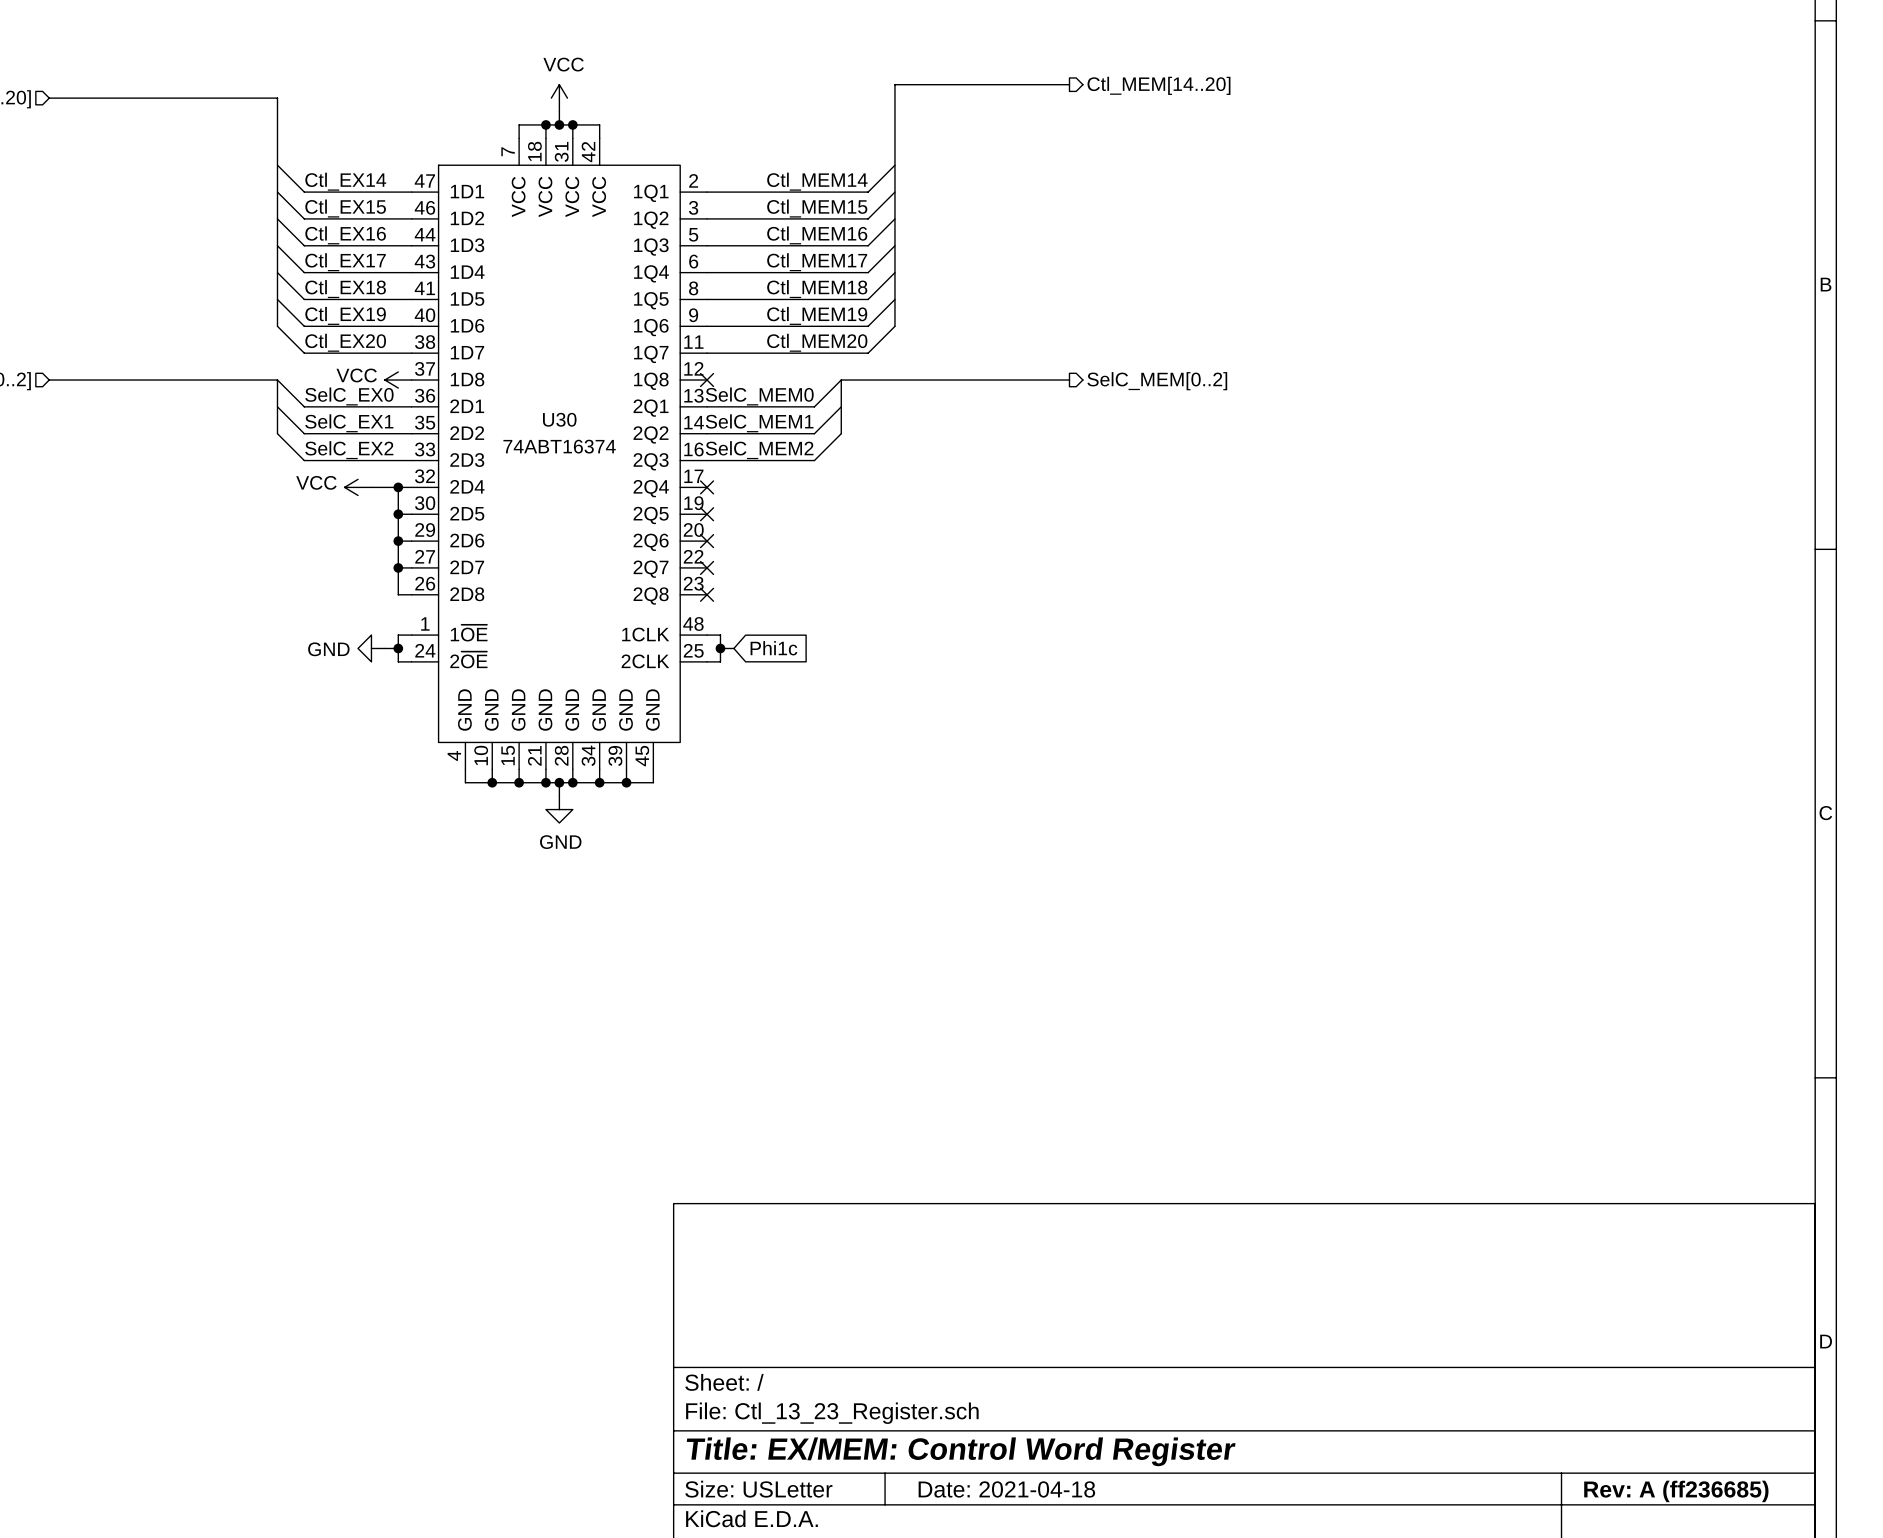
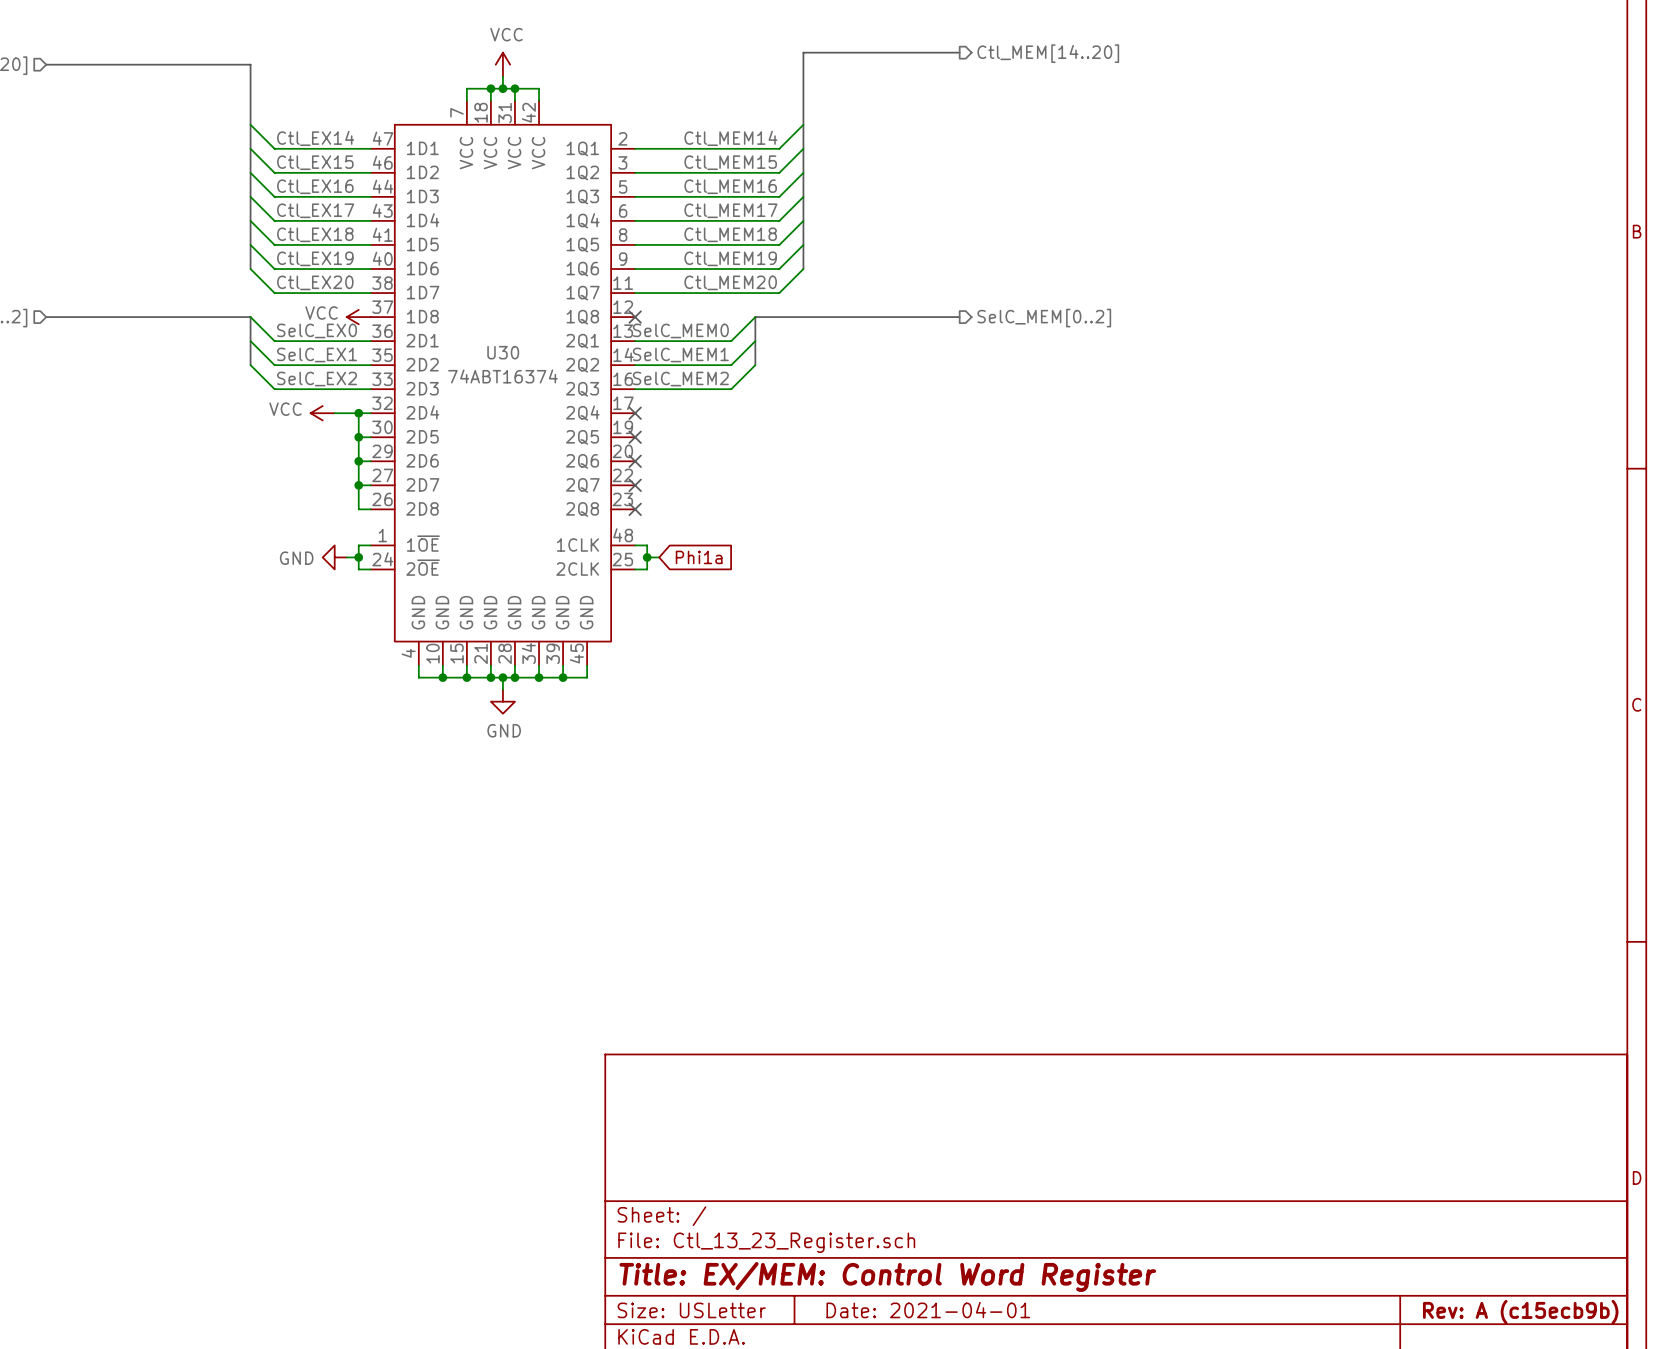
global label: Phi1c (773, 648) -> Phi1a (699, 557)
title block: Date: 2021-04-18 (1006, 1489) -> Date: 2021-04-01 (928, 1310)
title block: Rev: A (ff236685) (1676, 1491) -> Rev: A (c15ecb9b) (1520, 1312)

